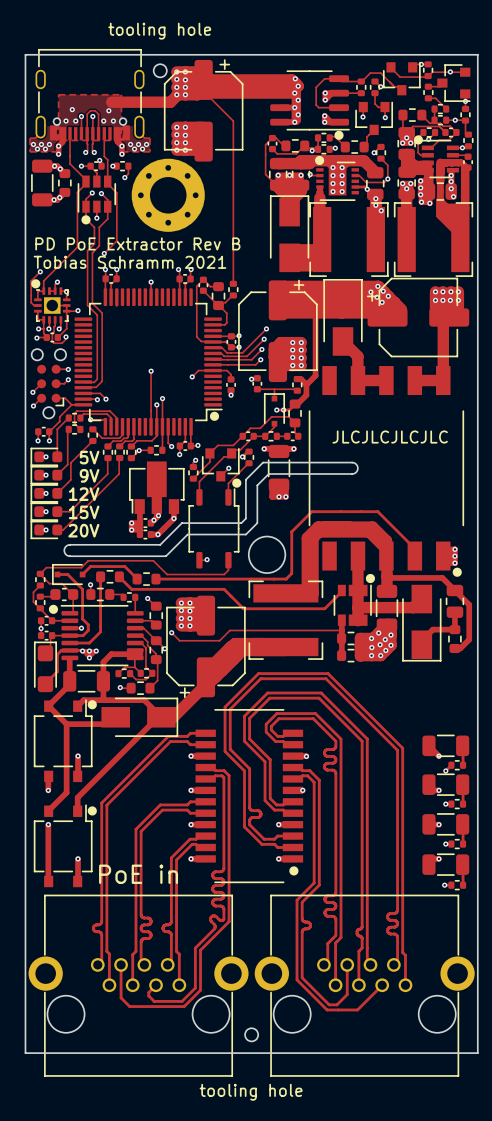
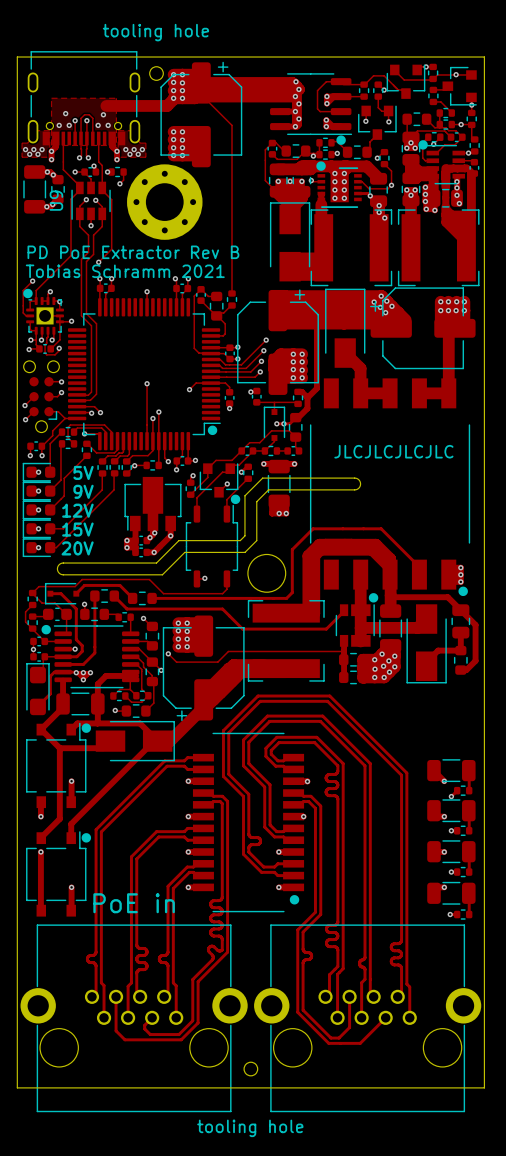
U9 name: none -> U9 (56, 200)
drawing: [81, 215, 91, 225] -> none

